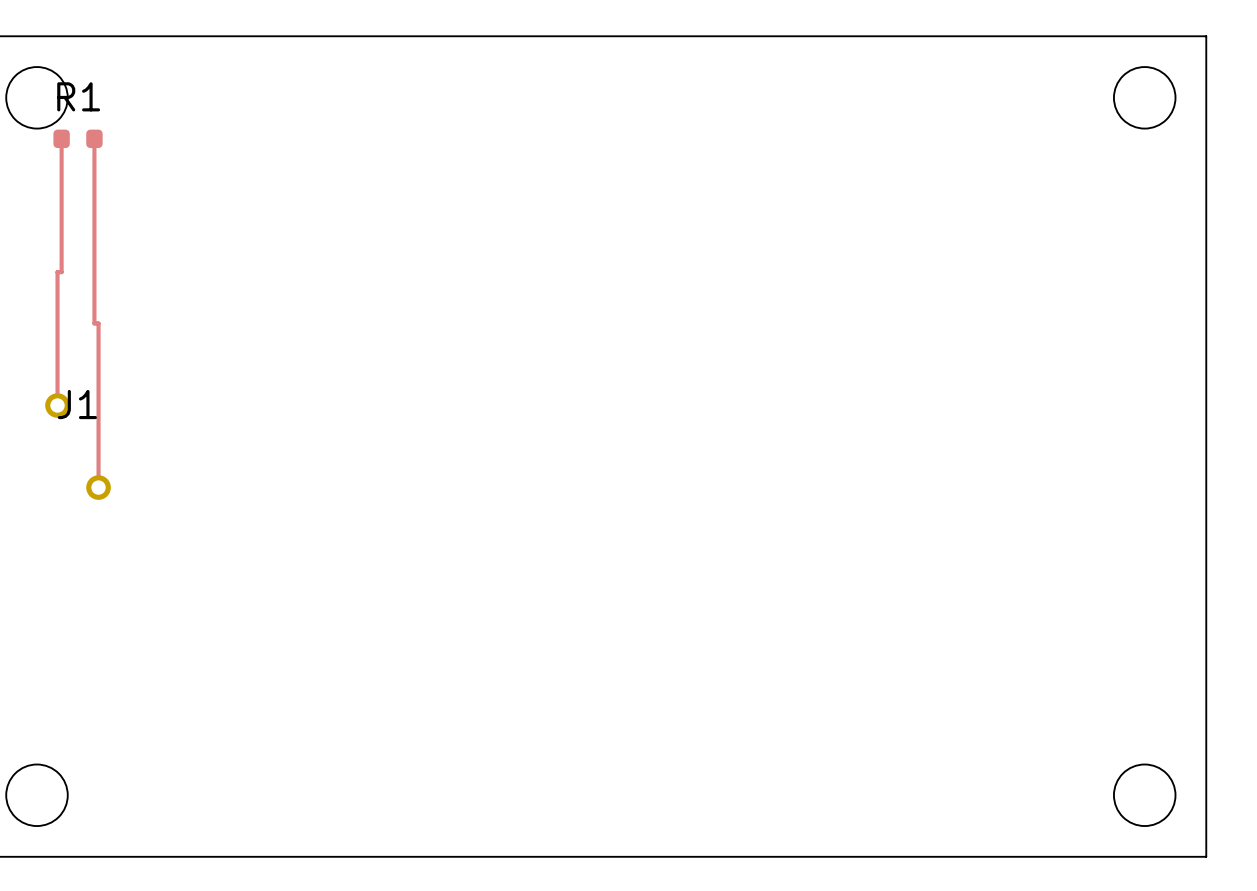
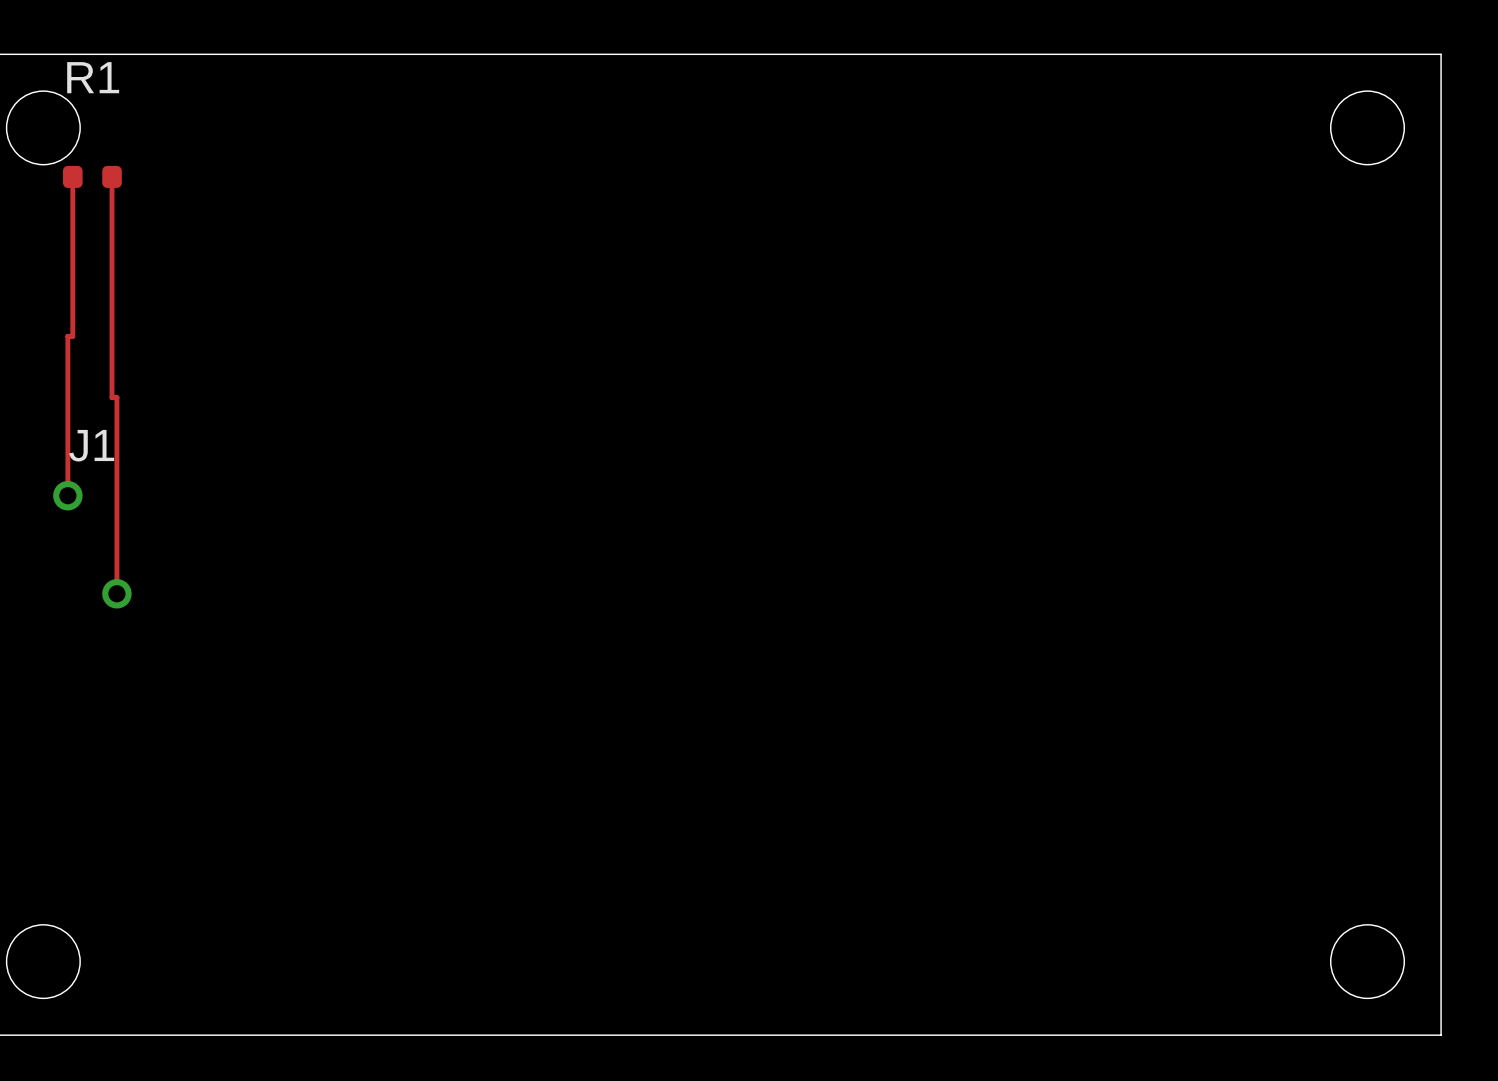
R1 name position: R1 (78, 96) -> R1 (93, 77)
J1 name position: J1 (77, 404) -> J1 (91, 445)

